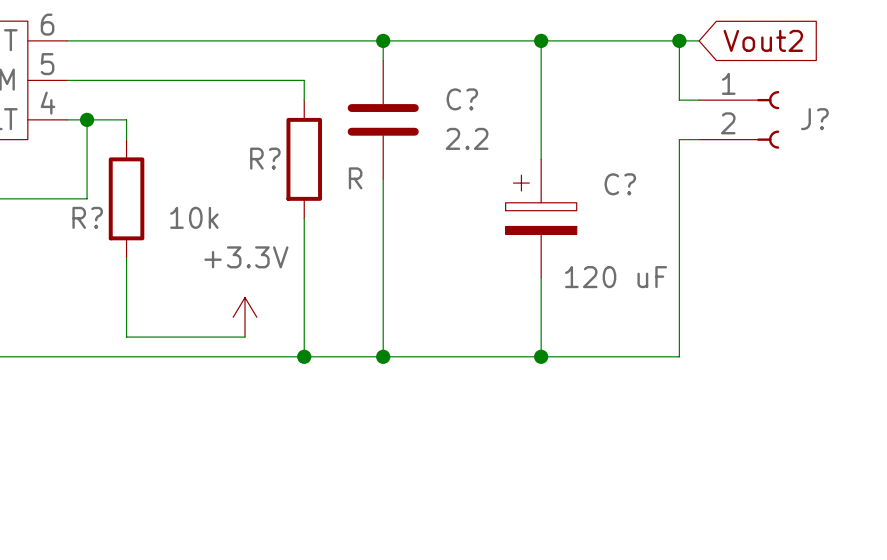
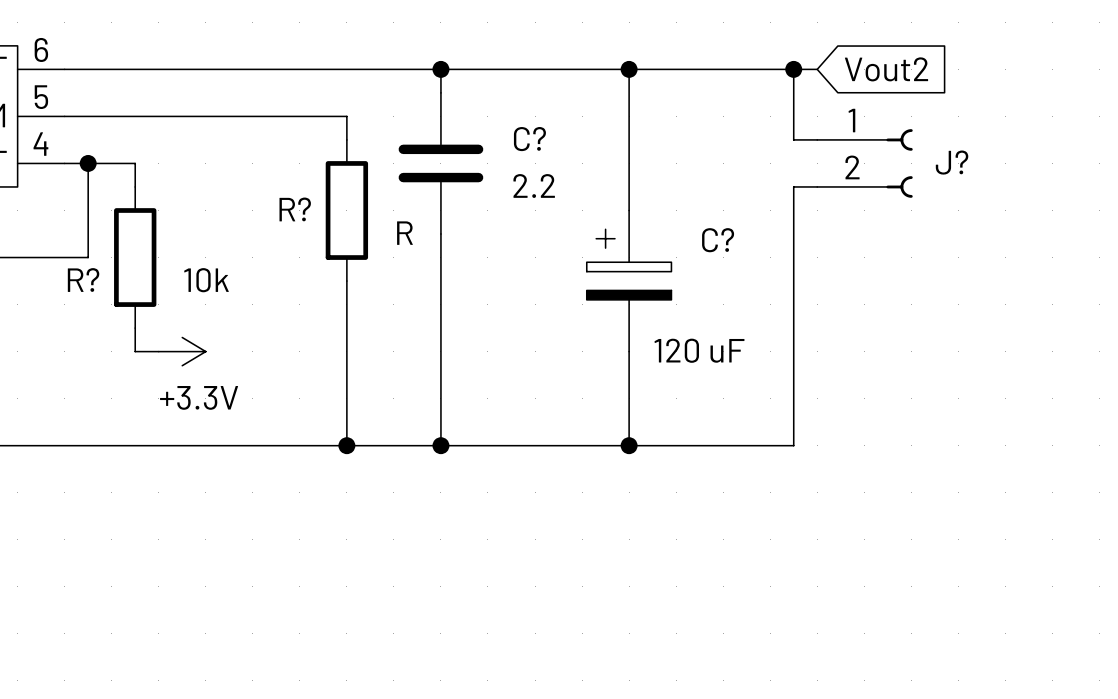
power symbol text position: +3.3V (246, 257) -> +3.3V (199, 397)
wire: (126, 277) (126, 337) (245, 337) -> (135, 351) (158, 351)
power symbol rotation: 0° (245, 317) -> 90° clockwise (182, 351)
power symbol position: +3.3V (245, 317) -> +3.3V (182, 351)

